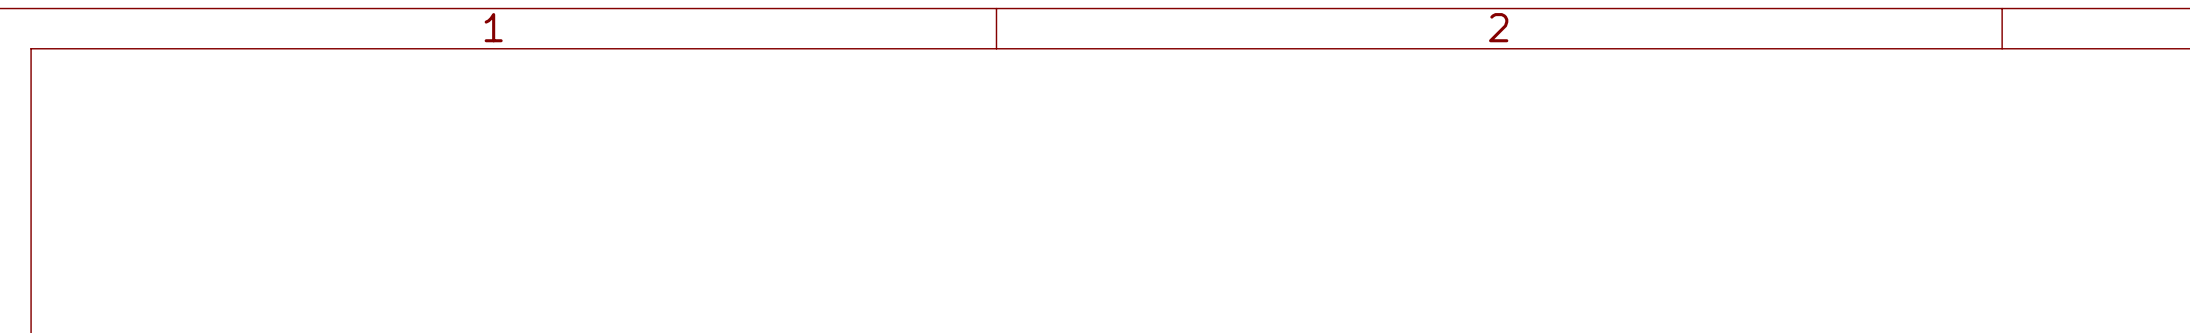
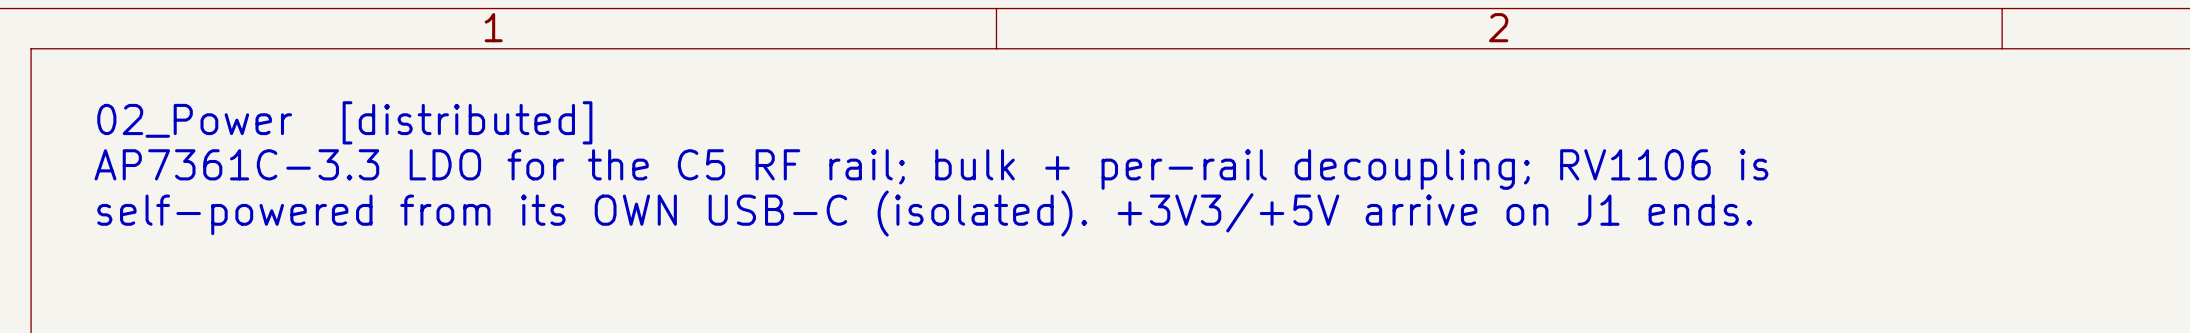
text: none -> 02_Power [distributed] (344, 122)
text: none -> AP7361C-3.3 LDO for the C5 RF rail; bulk + per-rail decoupling; RV1106 is (931, 169)
text: none -> self-powered from its OWN USB-C (isolated). +3V3/+5V arrive on J1 ends. (924, 213)

